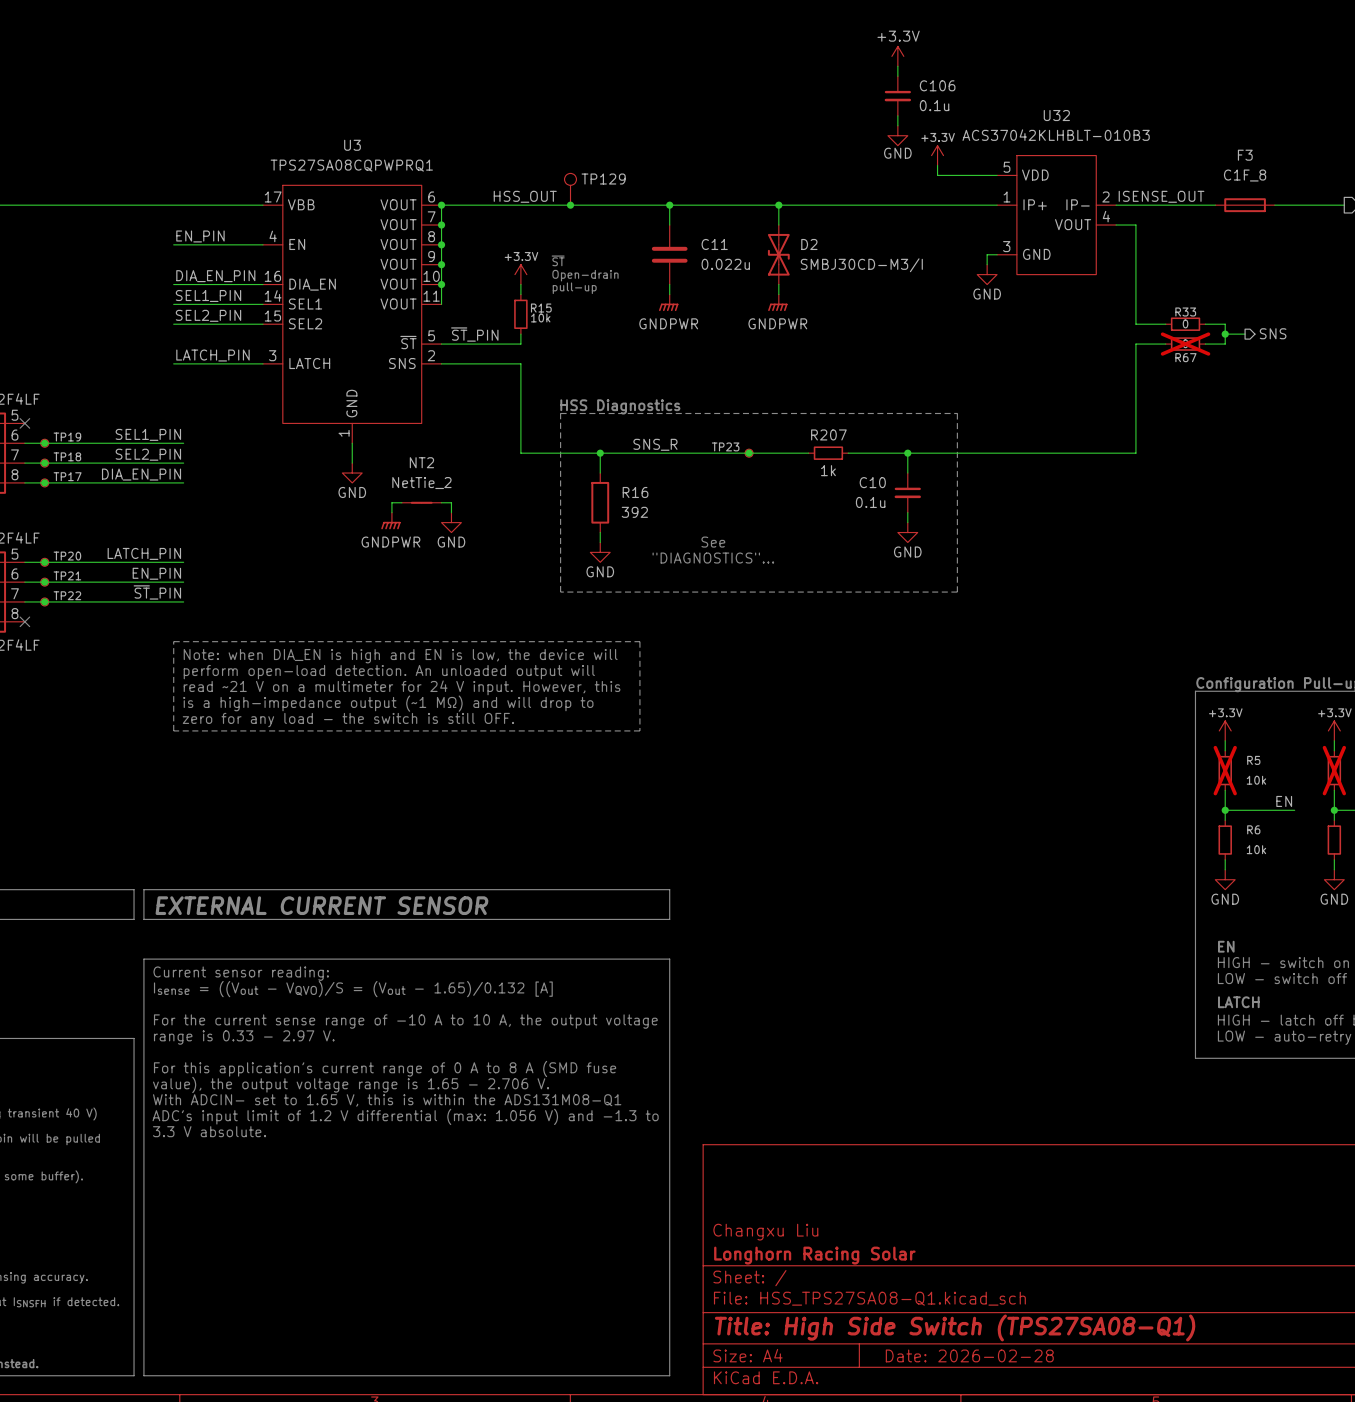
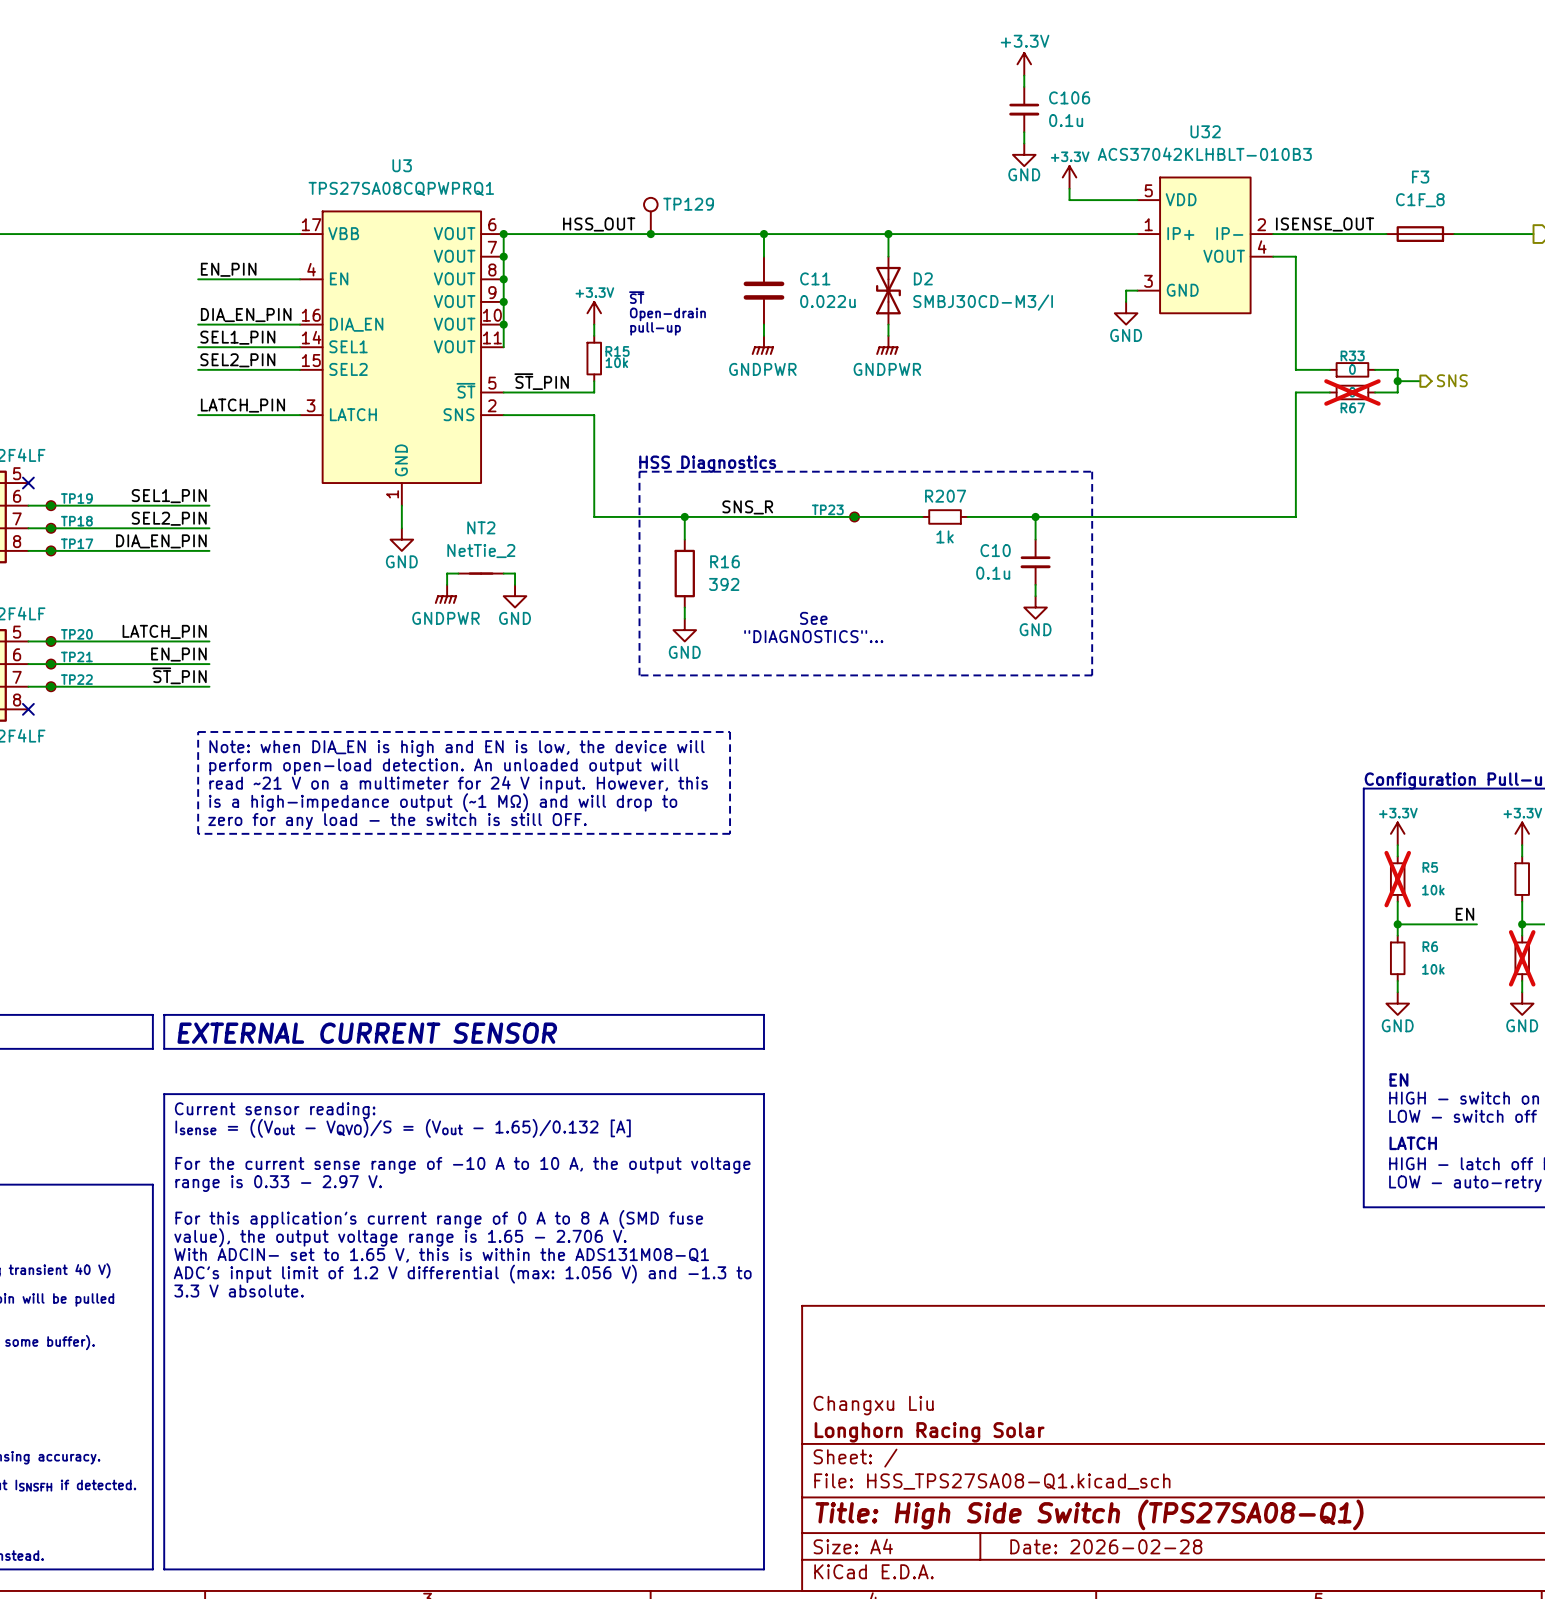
part do-not-place cross: (1334, 770) -> none
part do-not-place cross: none -> (1522, 958)

